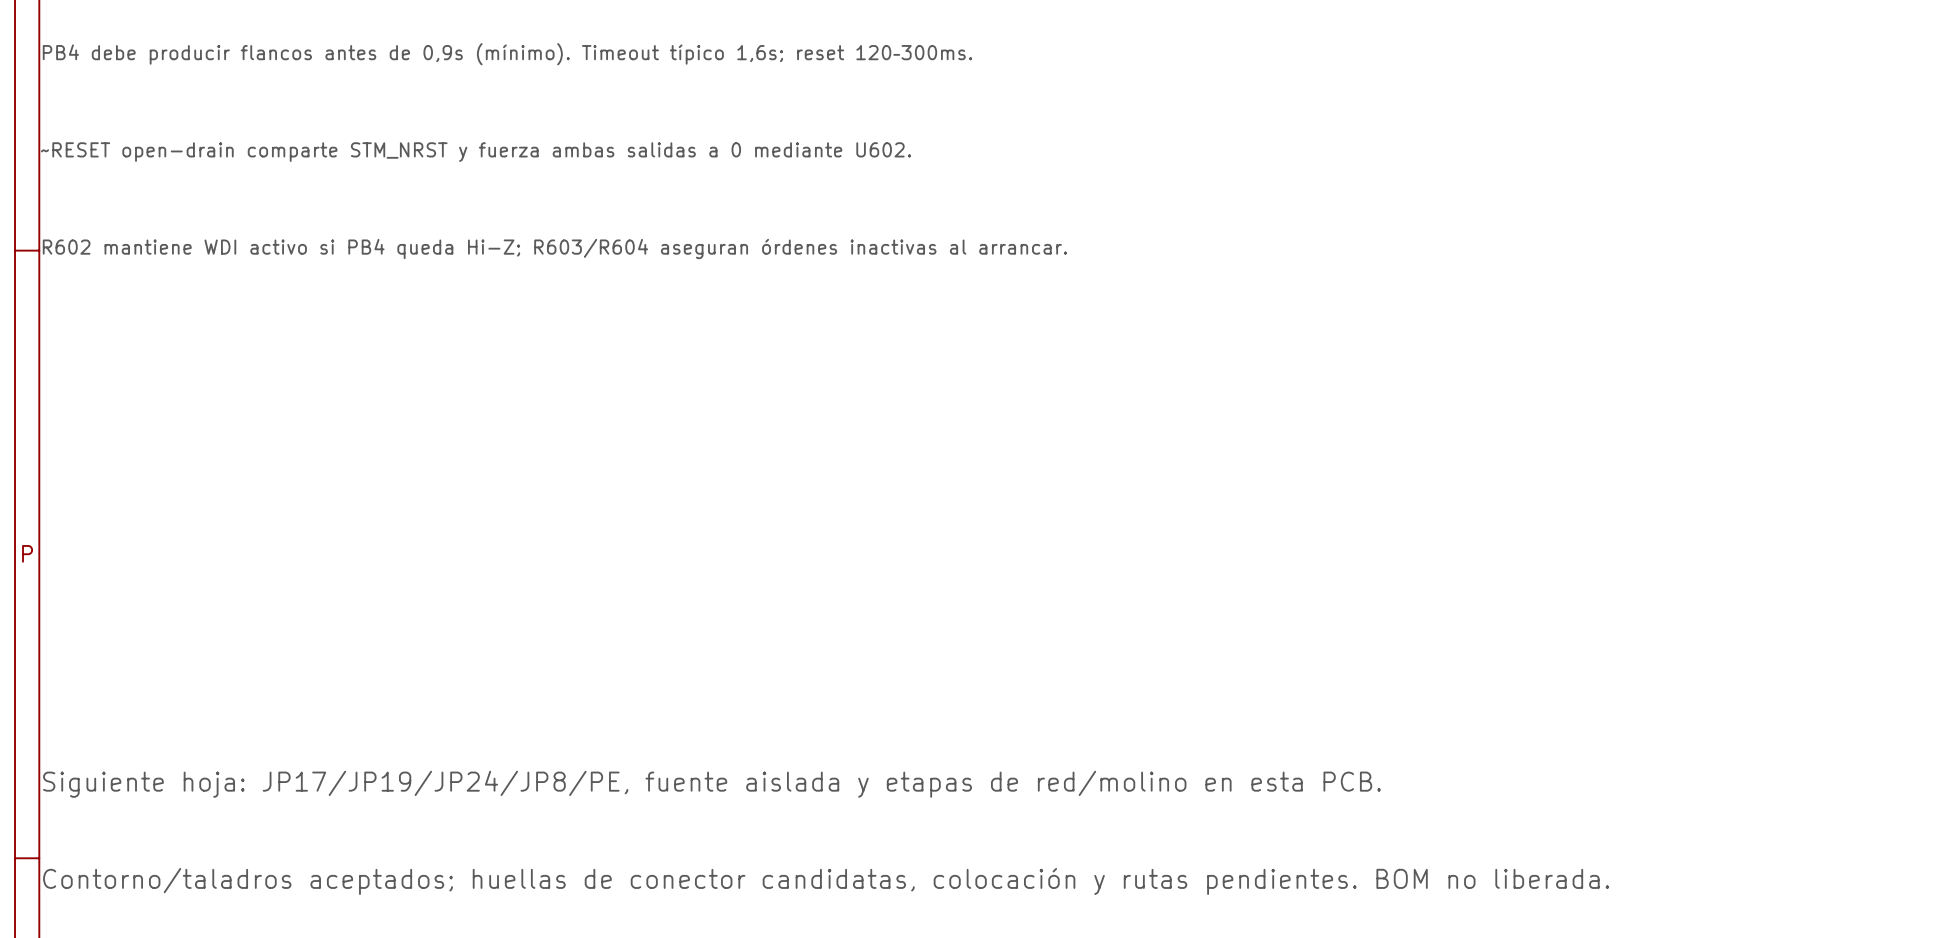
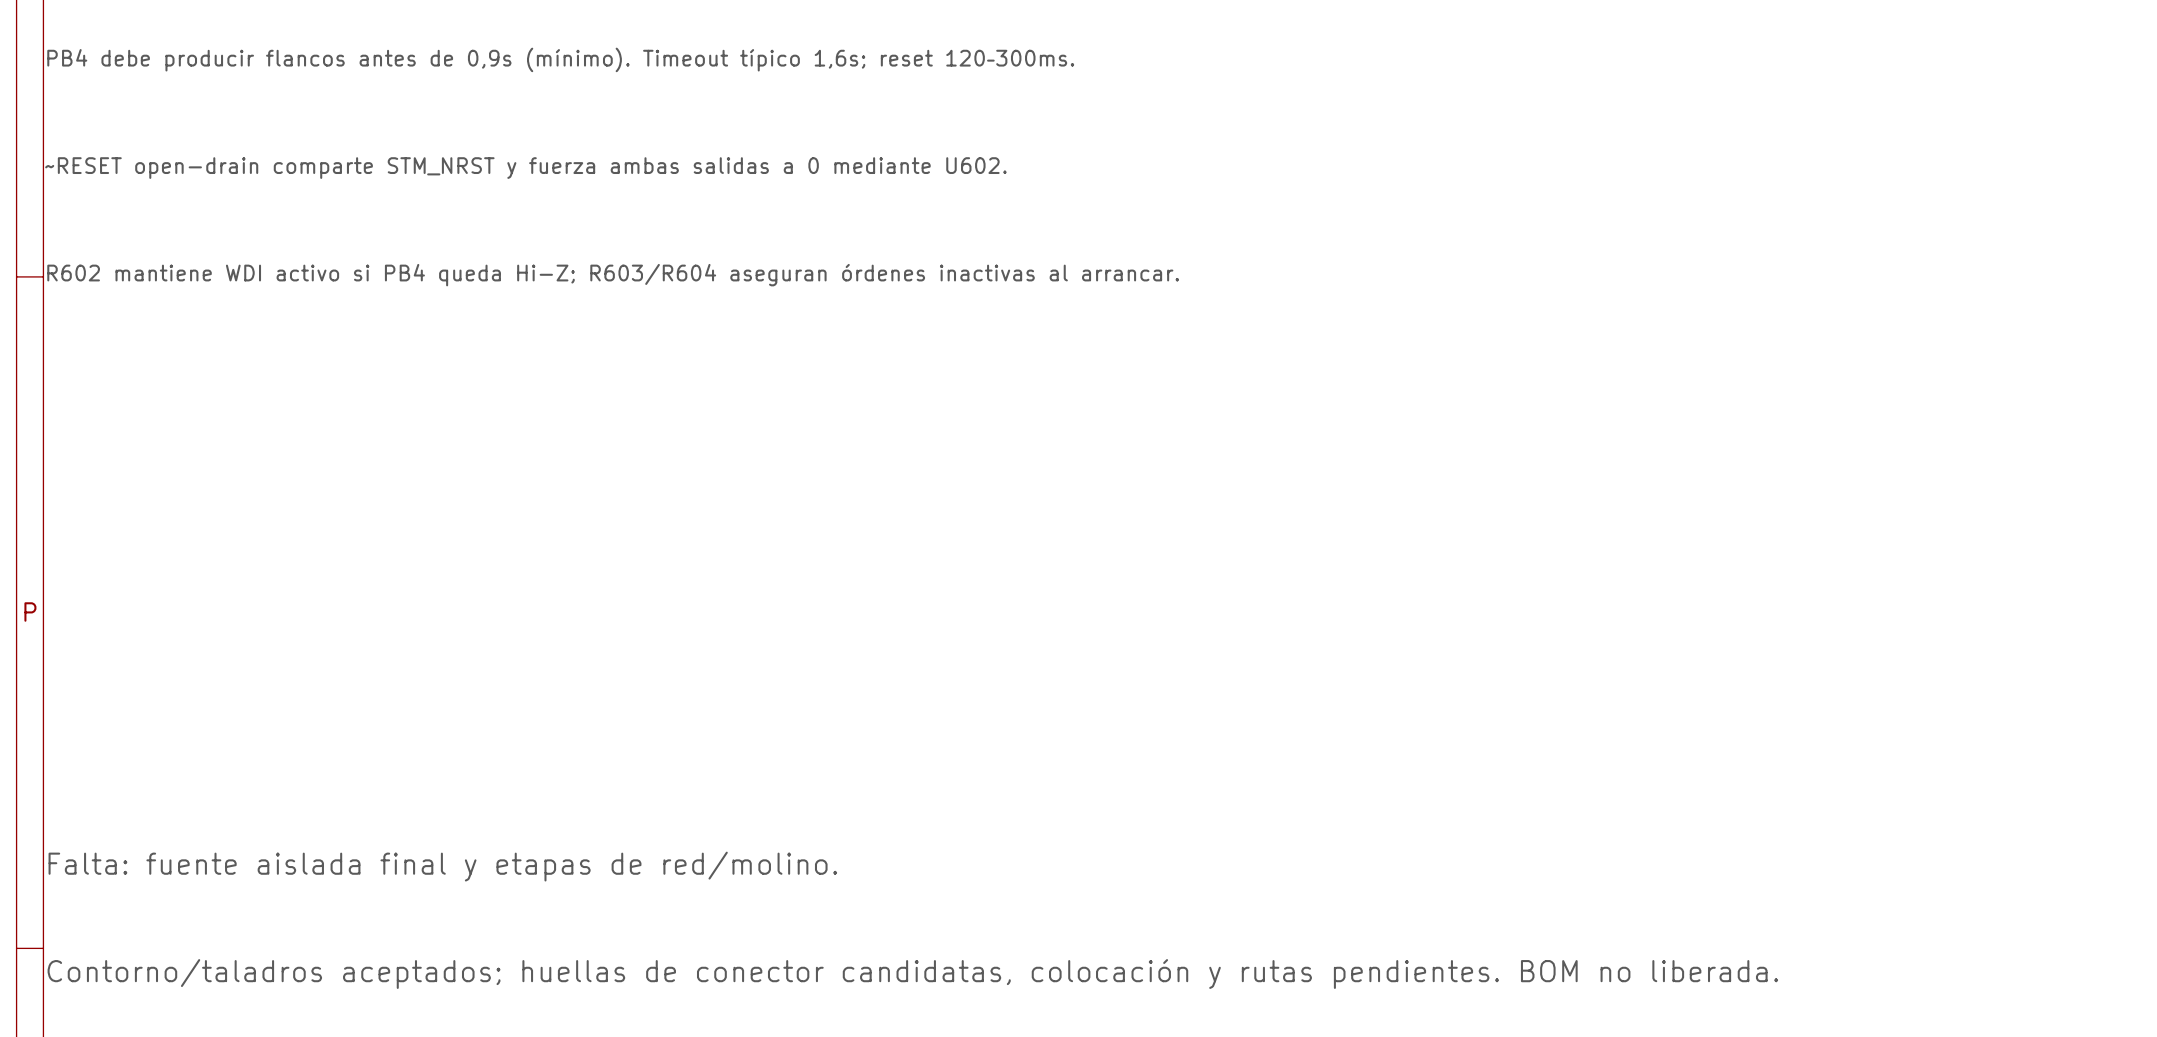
text: Siguiente hoja: JP17/JP19/JP24/JP8/PE, fuente aislada y etapas de red/molino en esta PCB. (711, 784) -> Falta: fuente aislada final y etapas de red/molino. (442, 866)

